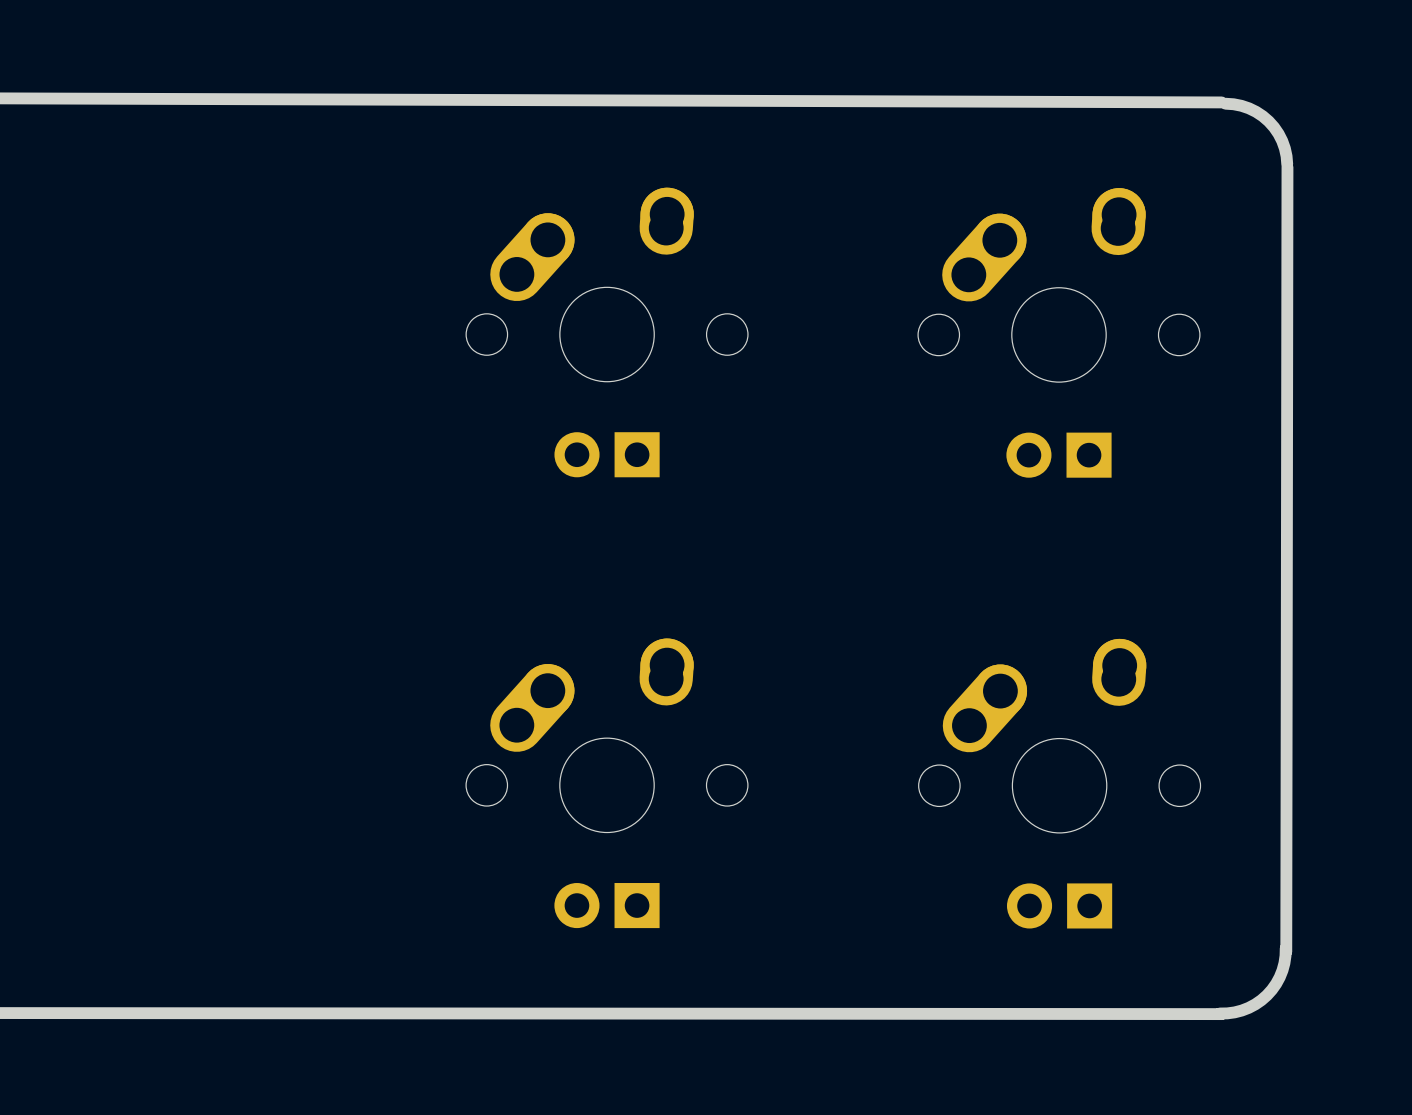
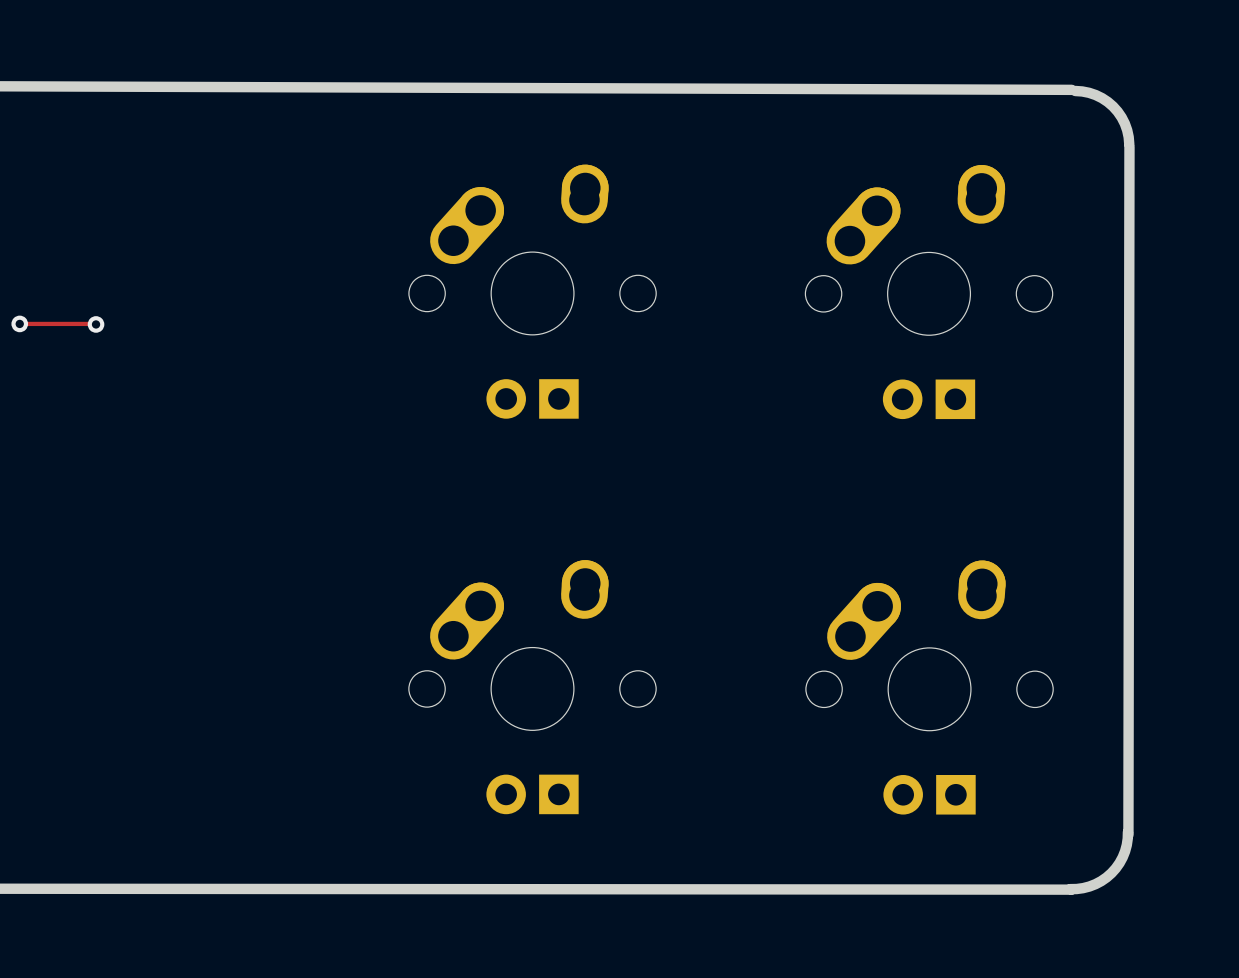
track: none -> (19, 323) (96, 324)
via: none -> (19, 323)
via: none -> (96, 324)

